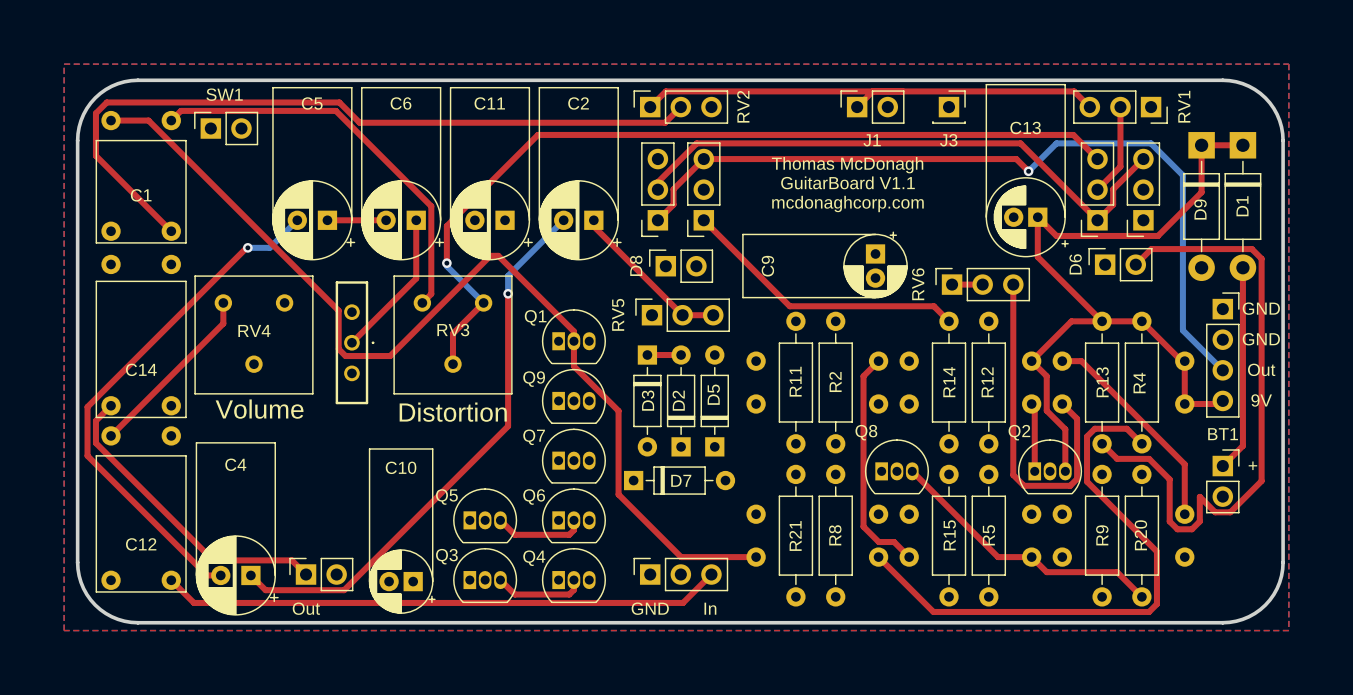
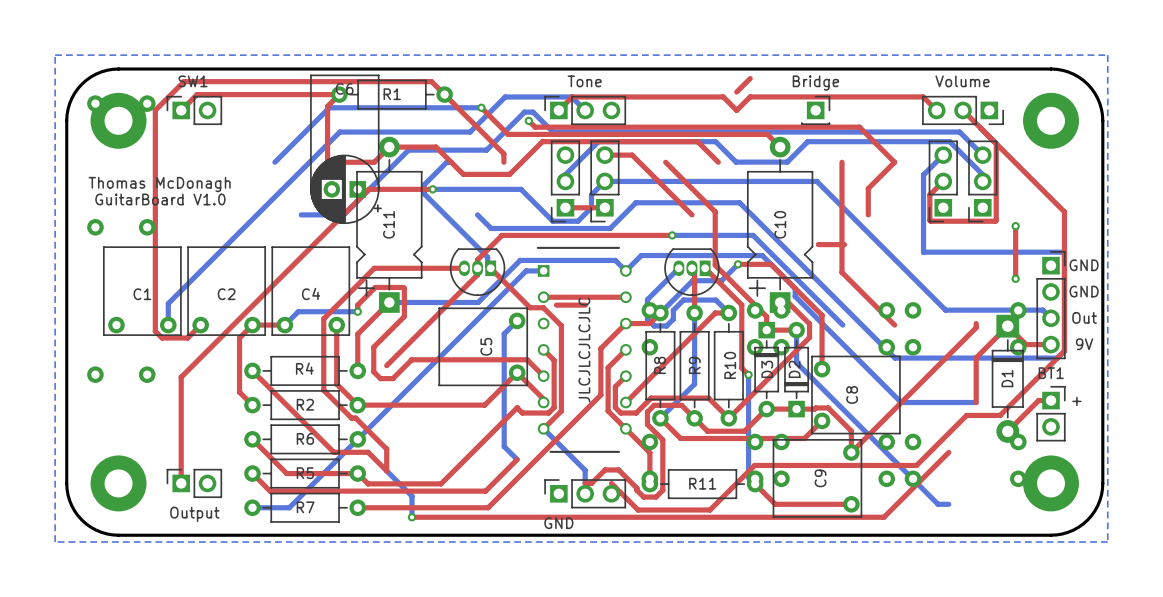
top zone outline: (64, 64) (64, 630) (1288, 630) (1288, 64) (64, 64) -> none
C5 footprint: [272, 86, 356, 261] -> [438, 307, 528, 386]
C11 footprint: [449, 86, 533, 261] -> [356, 136, 423, 313]
C2 footprint: [538, 86, 622, 261] -> [187, 246, 266, 336]
C5 name position: C5 (312, 103) -> C5 (486, 346)
C11 name position: C11 (489, 103) -> C11 (388, 224)
C2 name position: C2 (578, 103) -> C2 (226, 294)
top track: (650, 107) (665, 91) (1074, 91) (1089, 107) -> none
top track: (680, 107) (665, 122) (359, 122) (339, 102) (106, 102) (95, 113) (95, 155) (171, 231) -> none
RV2: (680, 107) -> none
J1: (872, 107) -> none
J3: (949, 107) -> none
top track: (1120, 107) (1120, 166) (1097, 189) -> none
RV1: (1120, 107) -> none
R1: none -> (391, 94)
top track: (111, 120) (148, 120) (338, 310) (338, 349) (345, 356) (390, 356) (490, 255) (498, 255) (573, 331) (573, 366) (618, 410) (618, 494) (681, 557) (756, 557) -> none
top track: (171, 120) (180, 110) (335, 110) (431, 206) (431, 294) (422, 302) -> none
top track: none -> (481, 107) (508, 134) (767, 134) (780, 147)
bottom track: none -> (481, 107) (329, 107) (274, 162)
via: none -> (481, 107)
top track: none -> (181, 110) (197, 94) (339, 94) (327, 106) (327, 162) (374, 162) (389, 147) (436, 147) (463, 174) (509, 174) (542, 141) (697, 141) (718, 162)
top track: none -> (558, 110) (572, 96) (723, 96) (736, 110) (750, 96) (923, 96) (936, 110)
bottom track: none -> (585, 110) (571, 96) (505, 96) (470, 132) (339, 132) (168, 303) (168, 325)
Tone: none -> (585, 110)
Bridge: none -> (815, 110)
top track: none -> (963, 110) (1064, 211) (1064, 351) (1000, 415) (966, 415) (916, 465) (754, 465) (710, 510) (638, 510) (611, 483)
Volume: none -> (963, 110)
part: none -> (118, 120)
top track: none -> (528, 120) (535, 127) (859, 127) (894, 162) (868, 188) (868, 214)
via: none -> (528, 120)
part: none -> (1051, 120)
top track: (1242, 145) (1201, 145) (1201, 192) (1158, 235) (1056, 235) (1037, 217) (1037, 257) (1102, 321) -> none
top track: (1097, 159) (1073, 134) (537, 134) (446, 226) (446, 263) -> none
top track: (1143, 159) (1113, 189) (1113, 204) (1097, 220) (1020, 143) (696, 143) (657, 182) (657, 189) -> none
text: Thomas McDonagh (847, 165) -> none
top track: none -> (996, 143) (995, 221) (930, 221) (929, 194) (943, 181)
C13: (1027, 170) -> none
top track: (1028, 171) (1016, 159) (703, 159) (673, 189) (673, 204) (657, 220) -> none
bottom track: (1028, 171) (1056, 143) (1150, 143) (1182, 175) (1182, 330) (1213, 360) -> (432, 189) (521, 189) (552, 221) (577, 221) (591, 207) (591, 194) (604, 181) (816, 181) (945, 310) (1042, 310)
via: (1028, 171) -> none
top track: none -> (604, 155) (632, 155) (691, 214)
bottom track: none -> (943, 155) (923, 174) (923, 252) (1063, 252) (1064, 351) (1057, 358) (894, 358) (739, 202) (635, 202) (610, 228) (491, 228) (477, 214)
bottom track: none -> (982, 155) (959, 132) (553, 132) (533, 112) (524, 112) (486, 150) (408, 150) (343, 214) (301, 214)
text: GuitarBoard V1.1 (847, 182) -> none
bottom track: none -> (451, 162) (446, 162) (423, 185) (423, 193) (487, 257) (487, 266) (490, 268)
top track: none -> (503, 162) (503, 153) (431, 81) (184, 81) (155, 110) (155, 331) (162, 338) (187, 338) (200, 325)
top track: none -> (665, 162) (715, 211) (715, 265) (766, 316) (766, 330)
top track: none -> (841, 162) (841, 272) (894, 325)
part position: (657, 189) -> (565, 181)
part position: (703, 189) -> (604, 181)
part position: (1097, 189) -> (943, 181)
part position: (1143, 189) -> (982, 181)
C1 position: (141, 191) -> (142, 291)
text: mcdonaghcorp.com (847, 204) -> none
D9: (1201, 206) -> none
D1 position: (1242, 206) -> (1007, 378)
bottom track: none -> (565, 181) (565, 174) (598, 141) (715, 141) (736, 162) (787, 162) (807, 141) (949, 141) (982, 174) (982, 181)
text: none -> Thomas McDonagh (159, 184)
bottom track: (297, 220) (269, 247) (247, 247) -> none
top track: (327, 220) (386, 220) -> none
top track: (416, 220) (416, 278) (351, 342) -> none
top track: none -> (432, 189) (369, 189) (181, 377) (181, 483)
via: none -> (432, 189)
bottom track: (563, 220) (508, 275) (508, 293) -> none
top track: (593, 220) (593, 226) (682, 315) (713, 315) -> none
top track: (703, 220) (789, 306) (933, 306) (949, 321) -> none
text: none -> GuitarBoard V1.0 (160, 199)
C9 footprint: [742, 231, 908, 299] -> [772, 439, 863, 518]
top track: none -> (565, 207) (604, 207)
top track: (247, 247) (87, 406) (87, 455) (207, 575) (220, 575) -> none
via: (247, 247) -> none
bottom track: (446, 263) (446, 266) (483, 302) -> none
via: (446, 263) -> none
top track: none -> (1015, 226) (1015, 278)
via: none -> (1015, 226)
D6: (1120, 264) -> none
top track: (1135, 264) (1151, 249) (1251, 249) (1261, 258) (1261, 481) (1230, 512) (1215, 512) (1199, 496) (1199, 521) (1191, 529) (1177, 529) (1169, 521) (1169, 479) (1149, 458) (1117, 458) (1102, 443) -> none
D8: (681, 266) -> none
C9 name position: C9 (767, 266) -> C9 (820, 478)
top track: (1242, 267) (1242, 445) (1222, 466) -> (1007, 431) (1038, 400) (1051, 400)
top track: none -> (672, 235) (502, 235) (477, 259) (477, 274) (386, 365)
bottom track: none -> (672, 235) (753, 235) (842, 325)
via: none -> (672, 235)
RV6: (982, 284) -> none
top track: (1013, 284) (1013, 475) (1024, 485) (1070, 485) (1077, 478) (1077, 418) (1062, 404) -> none
top track: (508, 293) (508, 426) (344, 590) (265, 590) (250, 575) -> none
via: (508, 293) -> none
top track: (223, 302) (223, 323) (111, 435) -> none
top track: (483, 302) (452, 333) (452, 364) -> none
top track: none -> (738, 264) (771, 264) (822, 315) (822, 369)
bottom track: none -> (738, 264) (721, 280) (692, 280) (660, 313)
via: none -> (738, 264)
top track: none -> (464, 268) (374, 268) (323, 318) (323, 390) (386, 449) (386, 470) (368, 452) (333, 452) (252, 370)
top track: none -> (490, 268) (530, 307) (543, 307) (561, 325) (561, 411) (543, 428)
bottom track: none -> (678, 268) (647, 299) (647, 319) (654, 325) (666, 325) (673, 319) (673, 310) (683, 300) (715, 300) (728, 313)
top track: none -> (691, 268) (694, 270) (694, 313)
top track: none -> (705, 268) (741, 304) (741, 368) (748, 374)
bottom track: none -> (543, 270) (526, 270) (289, 507) (252, 507)
RV5: (682, 315) -> none
part: none -> (477, 272)
part: none -> (691, 272)
via: none -> (1015, 278)
RV4: (253, 334) -> none
RV3: (452, 334) -> none
Q1: (573, 336) -> none
part: (354, 342) -> none
top track: none -> (543, 297) (625, 297)
C14: (141, 349) -> none
top track: none -> (389, 302) (357, 334) (357, 370)
bottom track: none -> (389, 302) (478, 302) (520, 260) (615, 260) (625, 270) (641, 255) (762, 255) (795, 288) (795, 296) (901, 402) (976, 402)
top track: none -> (780, 302) (788, 302) (809, 323) (809, 337) (728, 418) (708, 398) (651, 398) (636, 413) (620, 413) (615, 407) (615, 386) (625, 376)
top track: (878, 361) (863, 376) (863, 526) (878, 542) (894, 542) (909, 557) -> none
top track: (1062, 361) (1081, 361) (1184, 464) (1184, 514) -> none
top track: none -> (357, 311) (357, 304) (375, 287) (404, 288) (404, 316) (373, 347) (373, 371) (380, 378) (392, 378) (411, 359) (527, 359) (543, 376)
bottom track: none -> (357, 311) (298, 311) (284, 325)
via: none -> (357, 311)
top track: none -> (660, 313) (649, 323) (625, 323) (600, 348) (600, 395) (488, 507) (357, 507)
bottom track: none -> (694, 313) (694, 384) (660, 418)
top track: none -> (728, 313) (715, 313) (625, 402)
bottom track: none -> (517, 320) (504, 333) (504, 446) (517, 459)
top track: none -> (976, 323) (976, 327) (851, 452) (851, 431) (828, 407) (766, 409) (744, 431) (707, 431) (681, 405) (654, 405) (647, 412) (647, 424) (662, 439) (662, 490) (656, 497) (643, 497) (618, 469) (605, 469) (591, 483) (585, 483)
top track: none -> (284, 325) (252, 325) (239, 338) (239, 392) (252, 405)
top track: none -> (336, 325) (336, 384) (357, 405) (484, 405) (517, 372) (543, 399) (543, 402)
R11 rotation: 0° (795, 382) -> 90° clockwise (702, 484)
R11 position: (795, 382) -> (702, 484)
R2 rotation: 0° (835, 382) -> 90° clockwise (305, 405)
R2 position: (835, 382) -> (305, 405)
R14: (949, 382) -> none
R12: (988, 382) -> none
R13: (1102, 382) -> none
R4 rotation: 0° (1141, 382) -> 90° clockwise (305, 370)
R4 position: (1141, 382) -> (305, 370)
top track: none -> (766, 330) (796, 330)
bottom track: none -> (796, 330) (796, 362) (938, 504) (948, 504)
Q9: (573, 396) -> none
D3 position: (647, 400) -> (766, 369)
D2 position: (681, 400) -> (796, 369)
D5: (714, 400) -> none
top track: (1222, 400) (1219, 404) (1184, 404) (1184, 361) (1181, 361) (1141, 321) (1071, 321) (1031, 361) (1046, 376) (1046, 410) (1065, 429) (1065, 471) -> (1051, 344) (1026, 344) (1007, 326) (976, 357) (976, 402)
top track: (1031, 404) (1034, 407) (1034, 471) -> none
top track: (111, 405) (95, 420) (95, 443) (213, 560) (291, 560) (306, 574) -> none
top track: none -> (543, 349) (554, 360) (554, 407) (548, 413) (522, 413) (517, 407) (441, 483) (368, 483) (357, 473) (286, 473) (252, 439)
JLCJLCJLCJLC: none -> (584, 349)
top track: none -> (625, 349) (608, 367) (608, 411) (649, 452) (649, 484)
text: Volume (259, 409) -> none
text: Distortion (453, 412) -> none
R10: none -> (728, 365)
bottom track: none -> (748, 374) (748, 477) (755, 484)
via: none -> (748, 374)
C4 footprint: [195, 442, 279, 616] -> [271, 246, 350, 336]
top track: (1141, 443) (1126, 428) (1094, 428) (1087, 436) (1087, 481) (1156, 551) (1156, 604) (1149, 611) (933, 611) (878, 557) -> none
C10 footprint: [368, 448, 436, 614] -> [747, 136, 814, 313]
Q7: (573, 456) -> none
C8: none -> (855, 395)
C4 name position: C4 (235, 464) -> C4 (311, 293)
Q8: (896, 466) -> none
Q2: (1050, 466) -> none
C10 name position: C10 (401, 467) -> C10 (780, 224)
top track: (912, 471) (997, 557) (1031, 557) (1046, 572) (1117, 572) (1141, 596) -> none
D7: (679, 480) -> none
top track: none -> (660, 418) (680, 438) (804, 438) (822, 420)
bottom track: none -> (543, 428) (585, 470) (585, 483)
R6: none -> (305, 439)
Q5: (485, 515) -> none
Q6: (573, 515) -> none
top track: (500, 520) (514, 534) (569, 534) (573, 530) (573, 520) -> none
C12: (141, 523) -> none
top track: none -> (948, 452) (884, 517) (411, 517)
top track: none -> (517, 459) (485, 491) (270, 491) (252, 473)
R21: (795, 535) -> none
R8 position: (835, 535) -> (660, 365)
R15: (949, 535) -> none
R5 rotation: 0° (988, 535) -> 90° clockwise (305, 473)
R5 position: (988, 535) -> (305, 473)
R9 position: (1102, 535) -> (694, 365)
R20: (1141, 535) -> none
bottom track: none -> (386, 470) (411, 496) (411, 517)
part: none -> (118, 483)
Output: none -> (194, 483)
part: none -> (1051, 483)
top track: none -> (755, 484) (775, 504) (851, 504)
part: (321, 574) -> none
top track: (711, 574) (683, 602) (193, 602) (171, 580) -> none
Q3: (485, 575) -> none
Q4: (573, 575) -> none
top track: (500, 580) (514, 594) (569, 594) (573, 589) (573, 580) -> none
R7: none -> (305, 507)
via: none -> (411, 517)
text: Out (306, 608) -> none
text: In (710, 608) -> none

